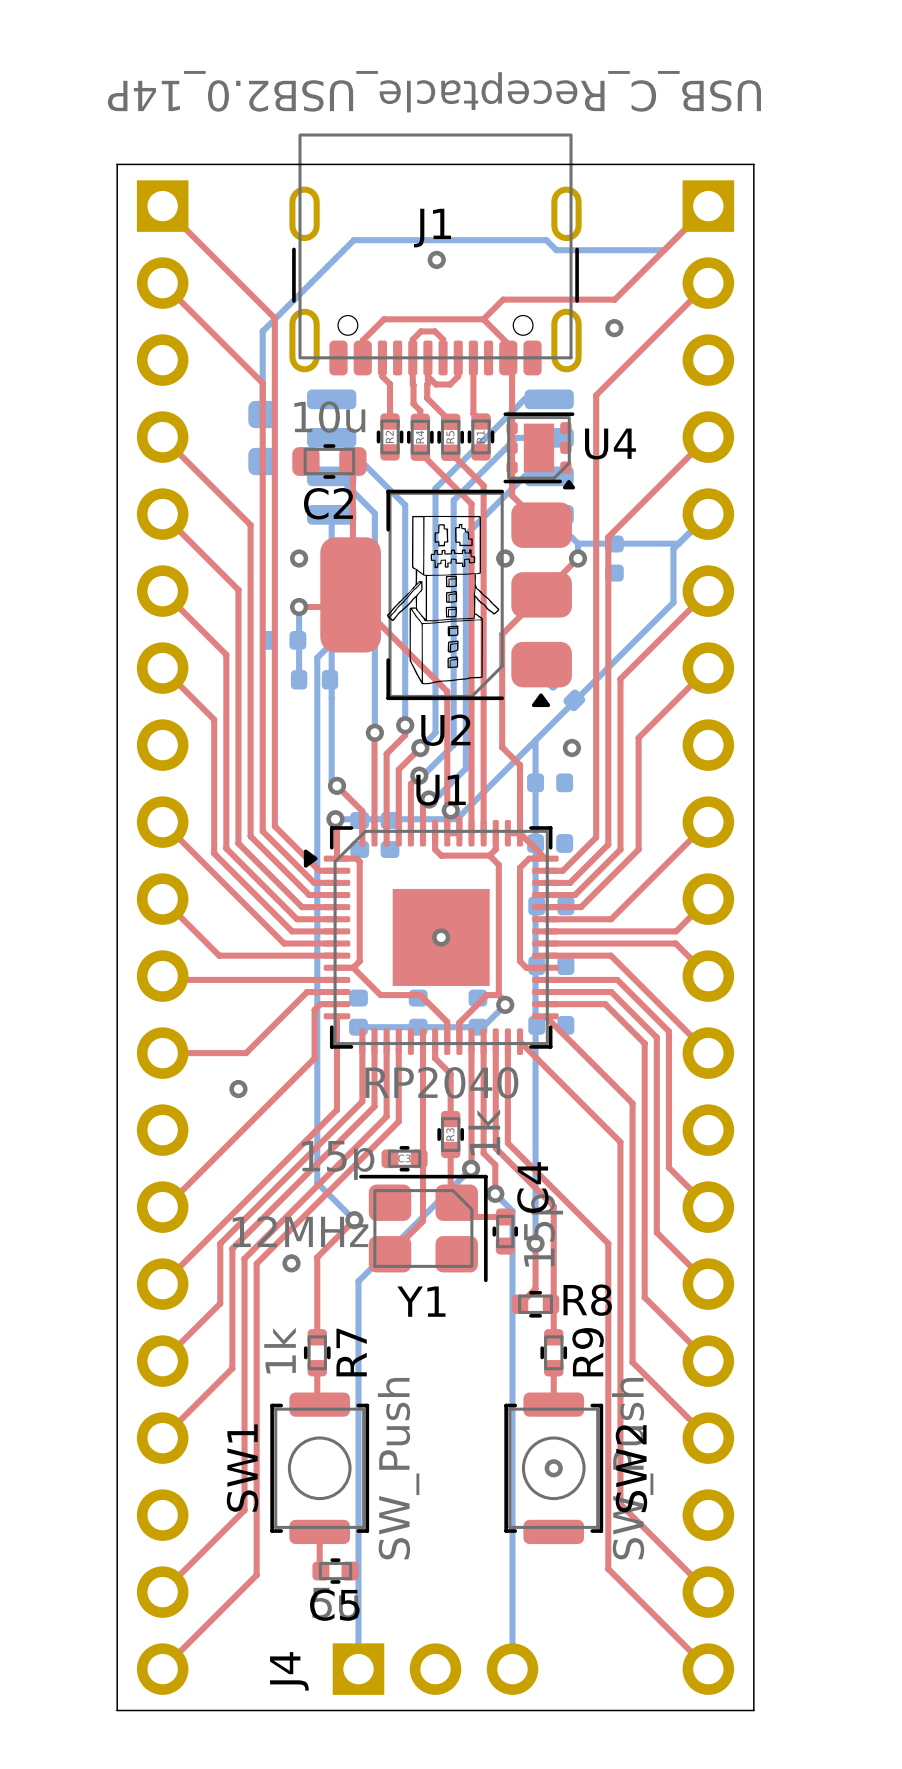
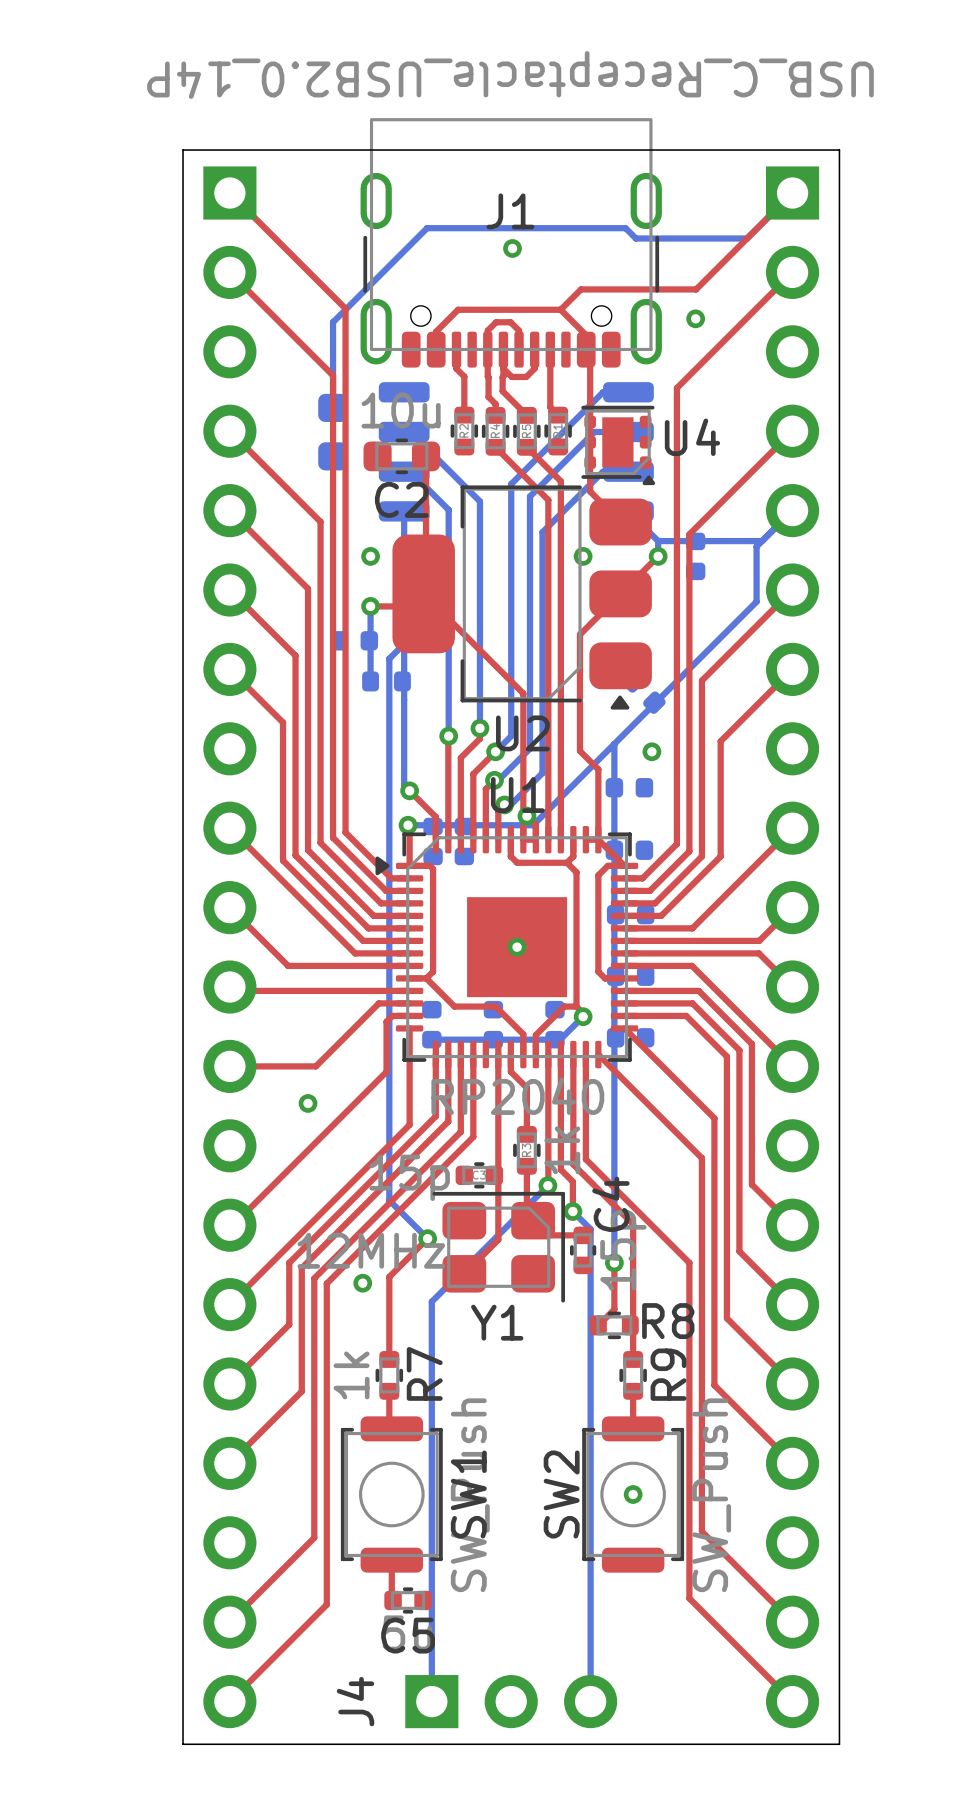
drawing: [386, 515, 500, 685] -> none
SW1 name position: SW1 (242, 1468) -> SW1 (468, 1494)
SW2 name position: SW2 (631, 1468) -> SW2 (561, 1494)

